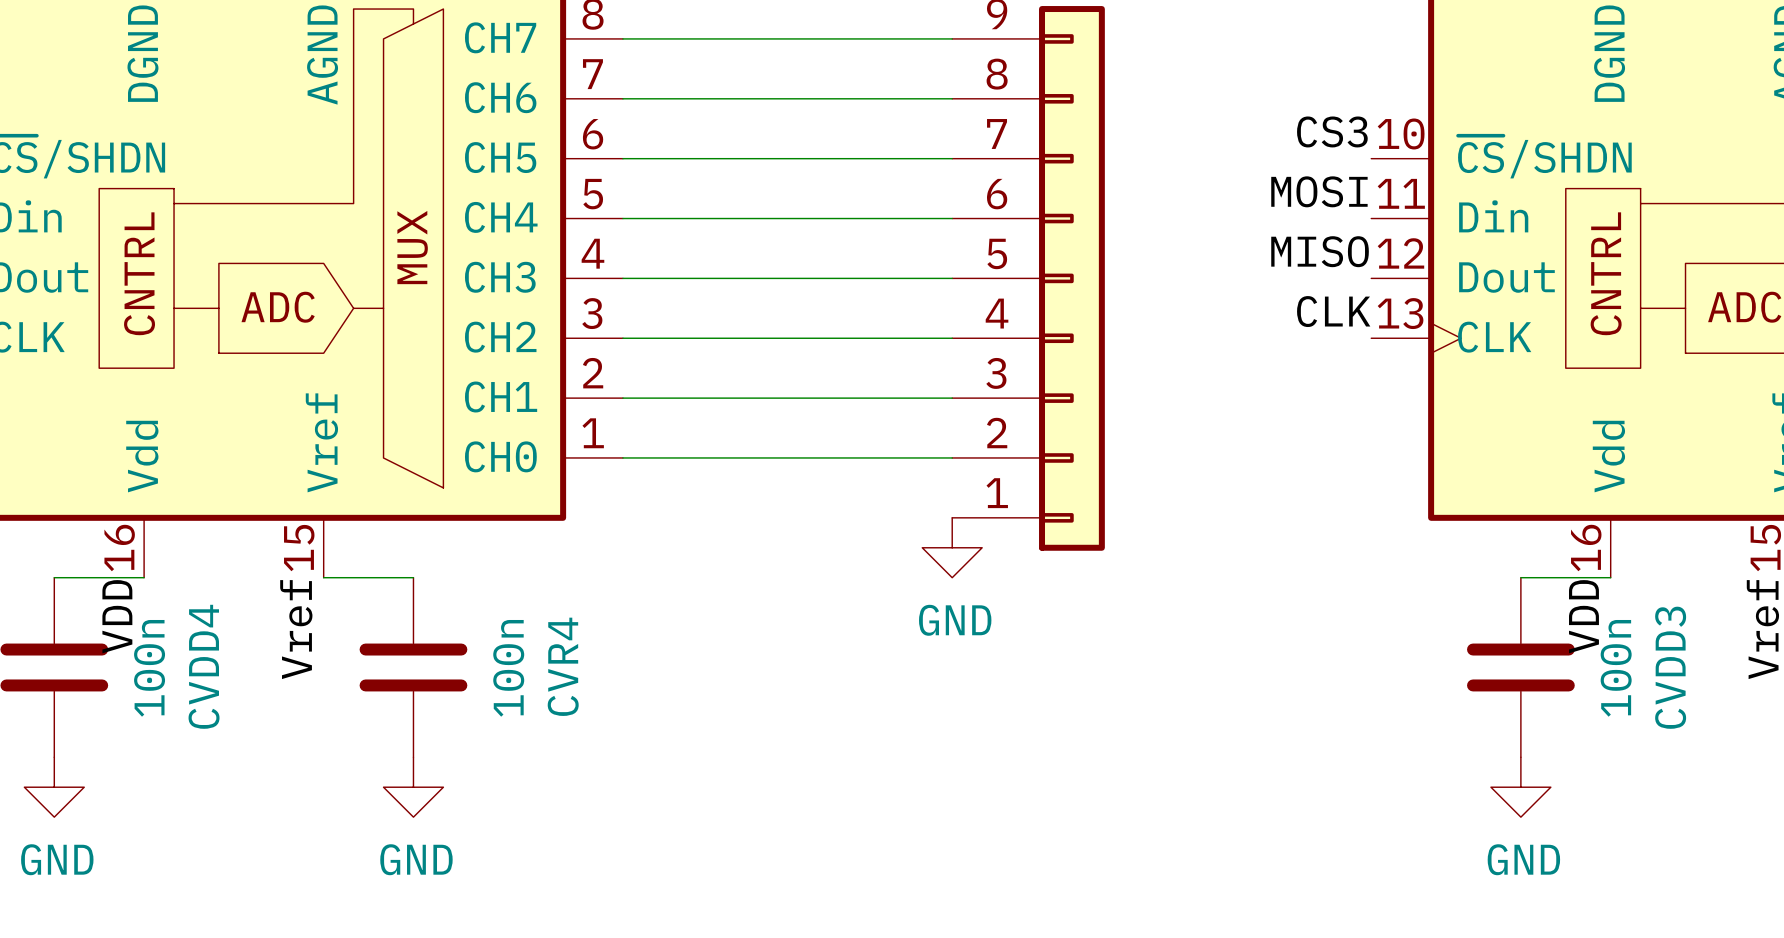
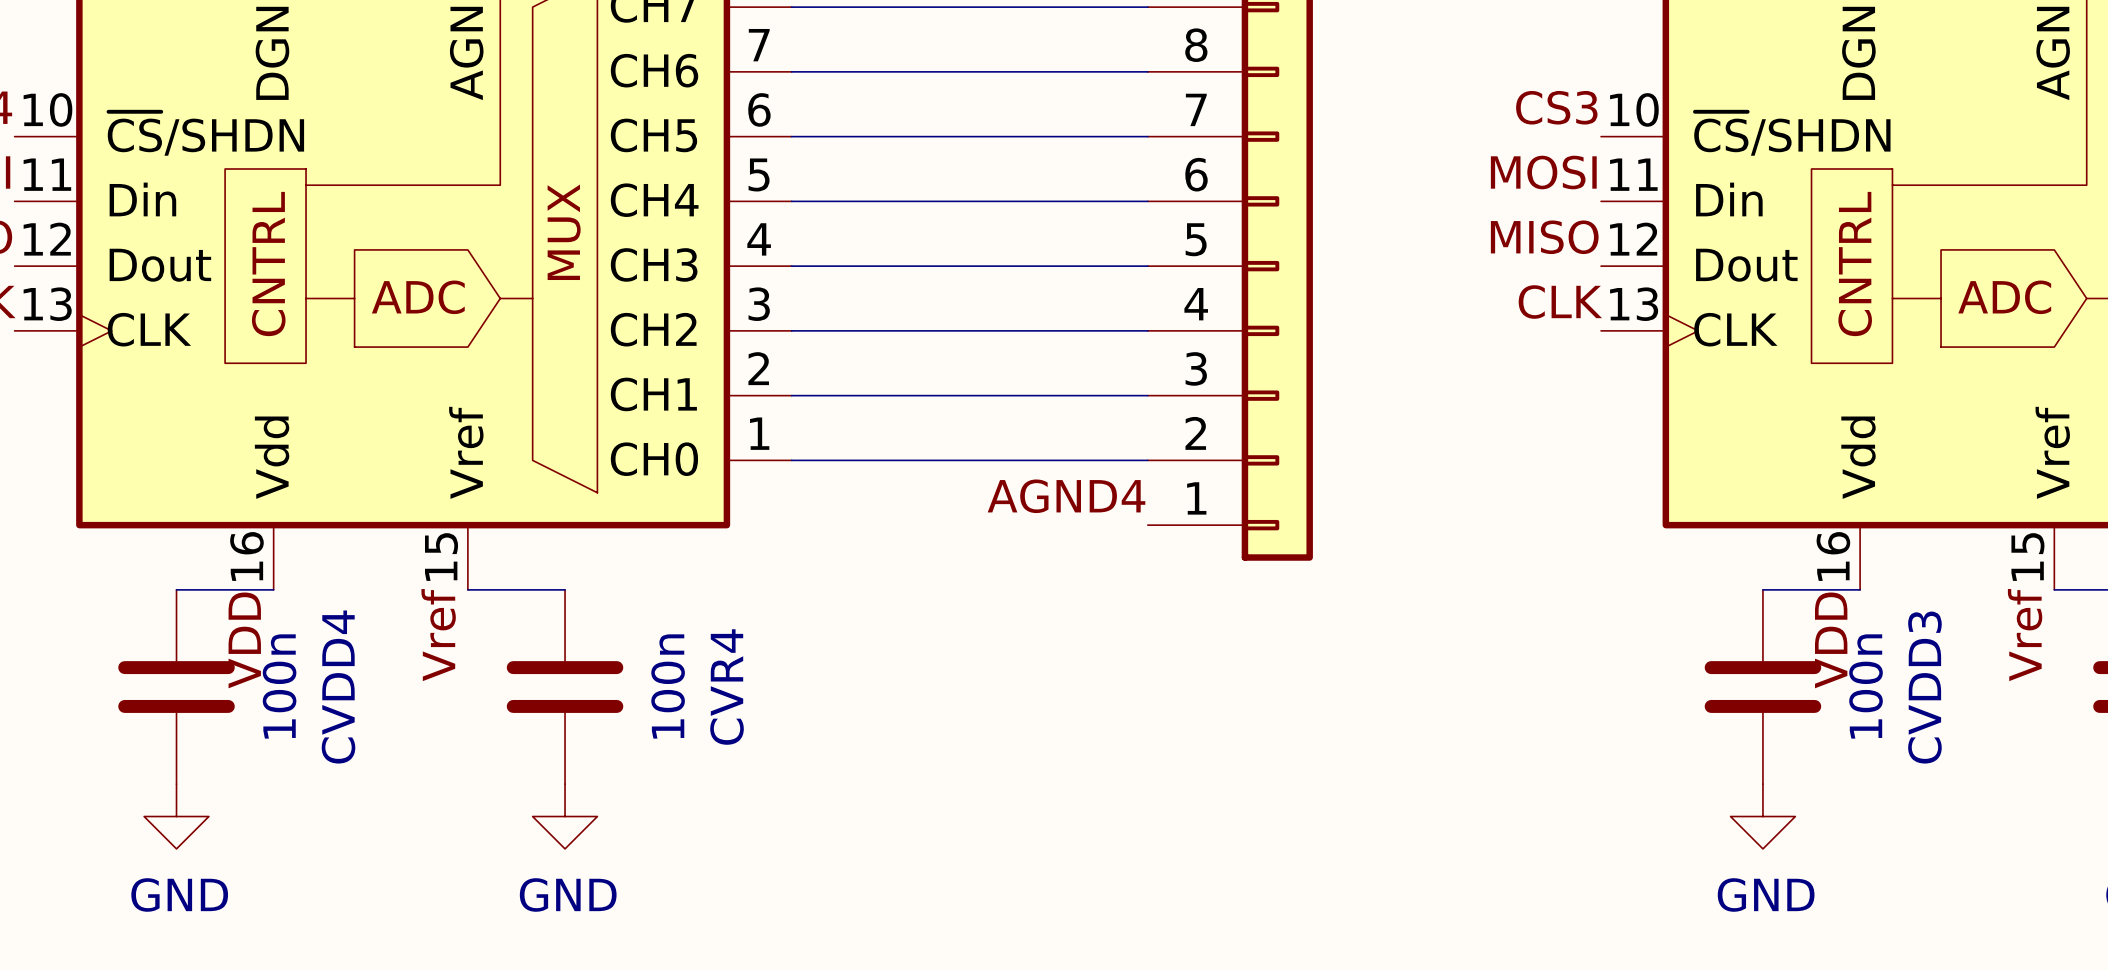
label: none -> AGND4 (1066, 496)
power symbol: GND (952, 547) -> none

